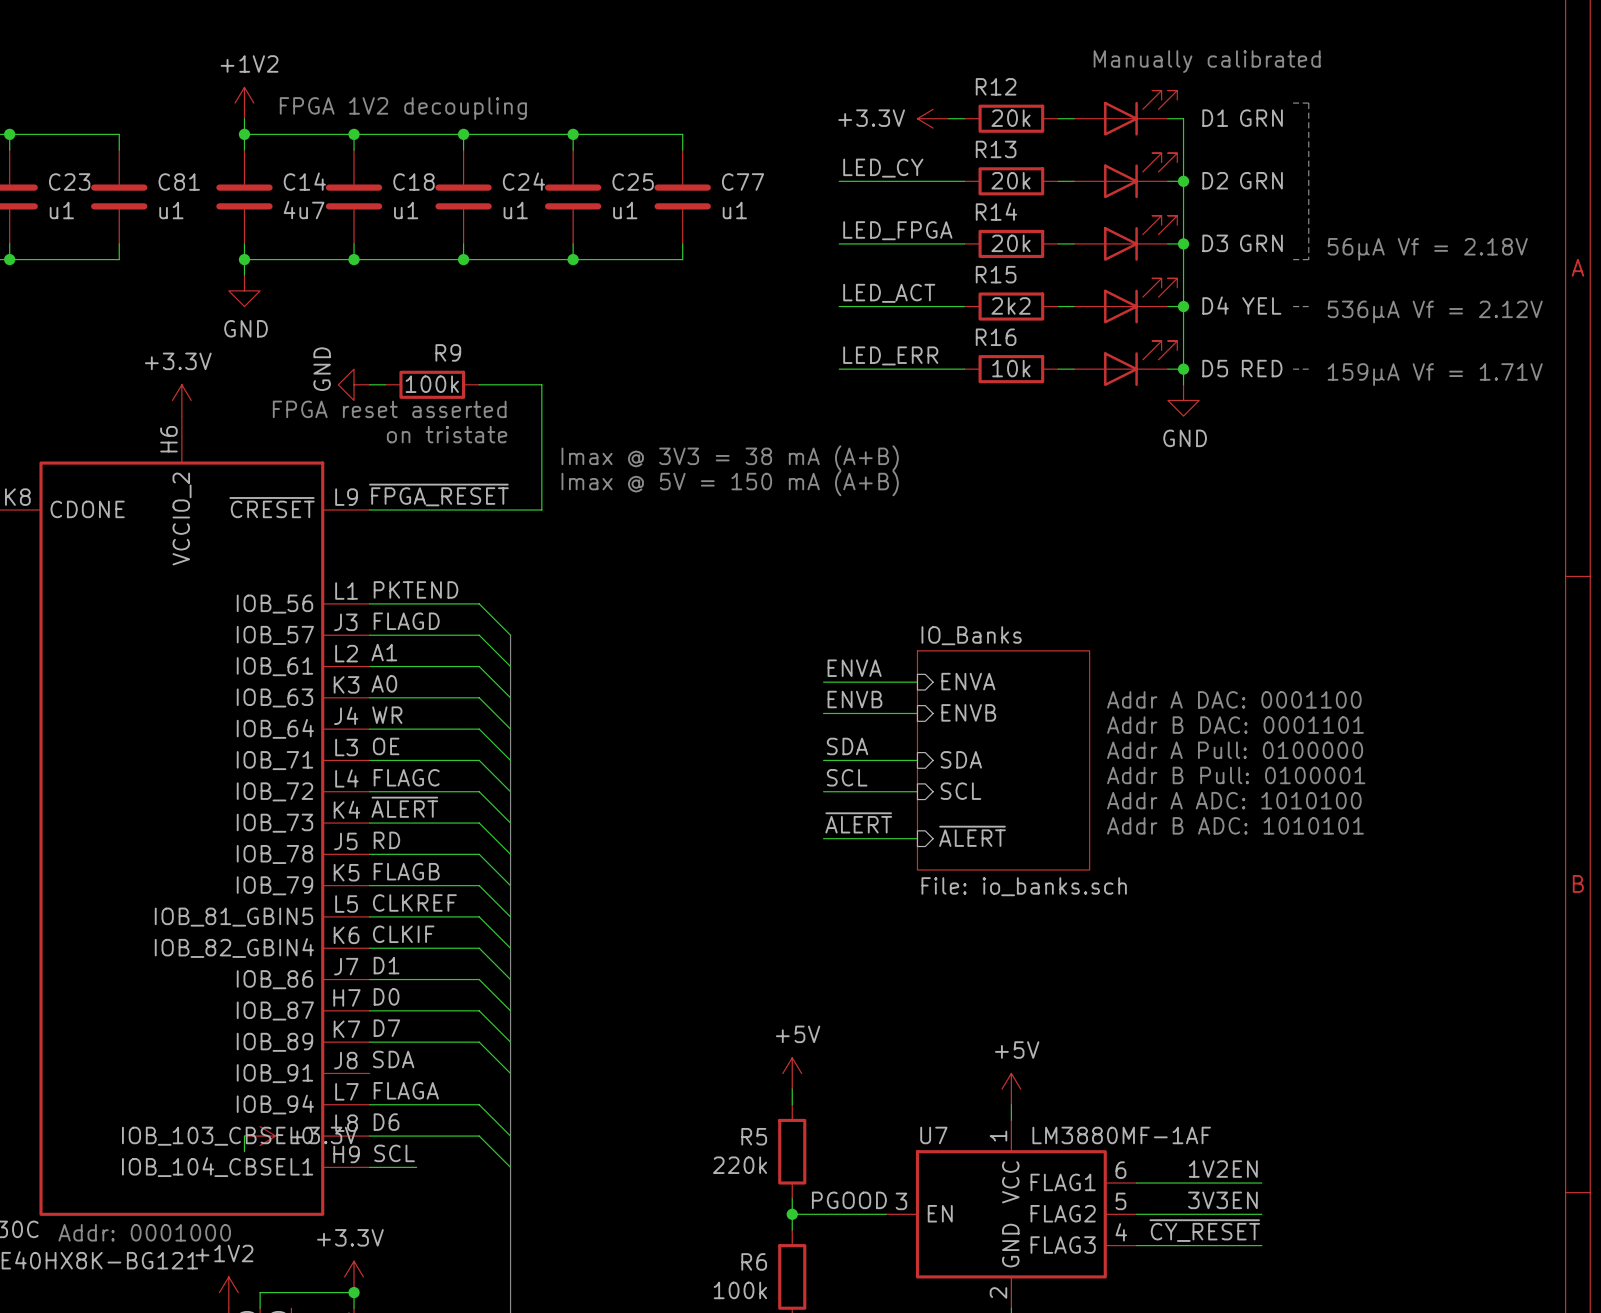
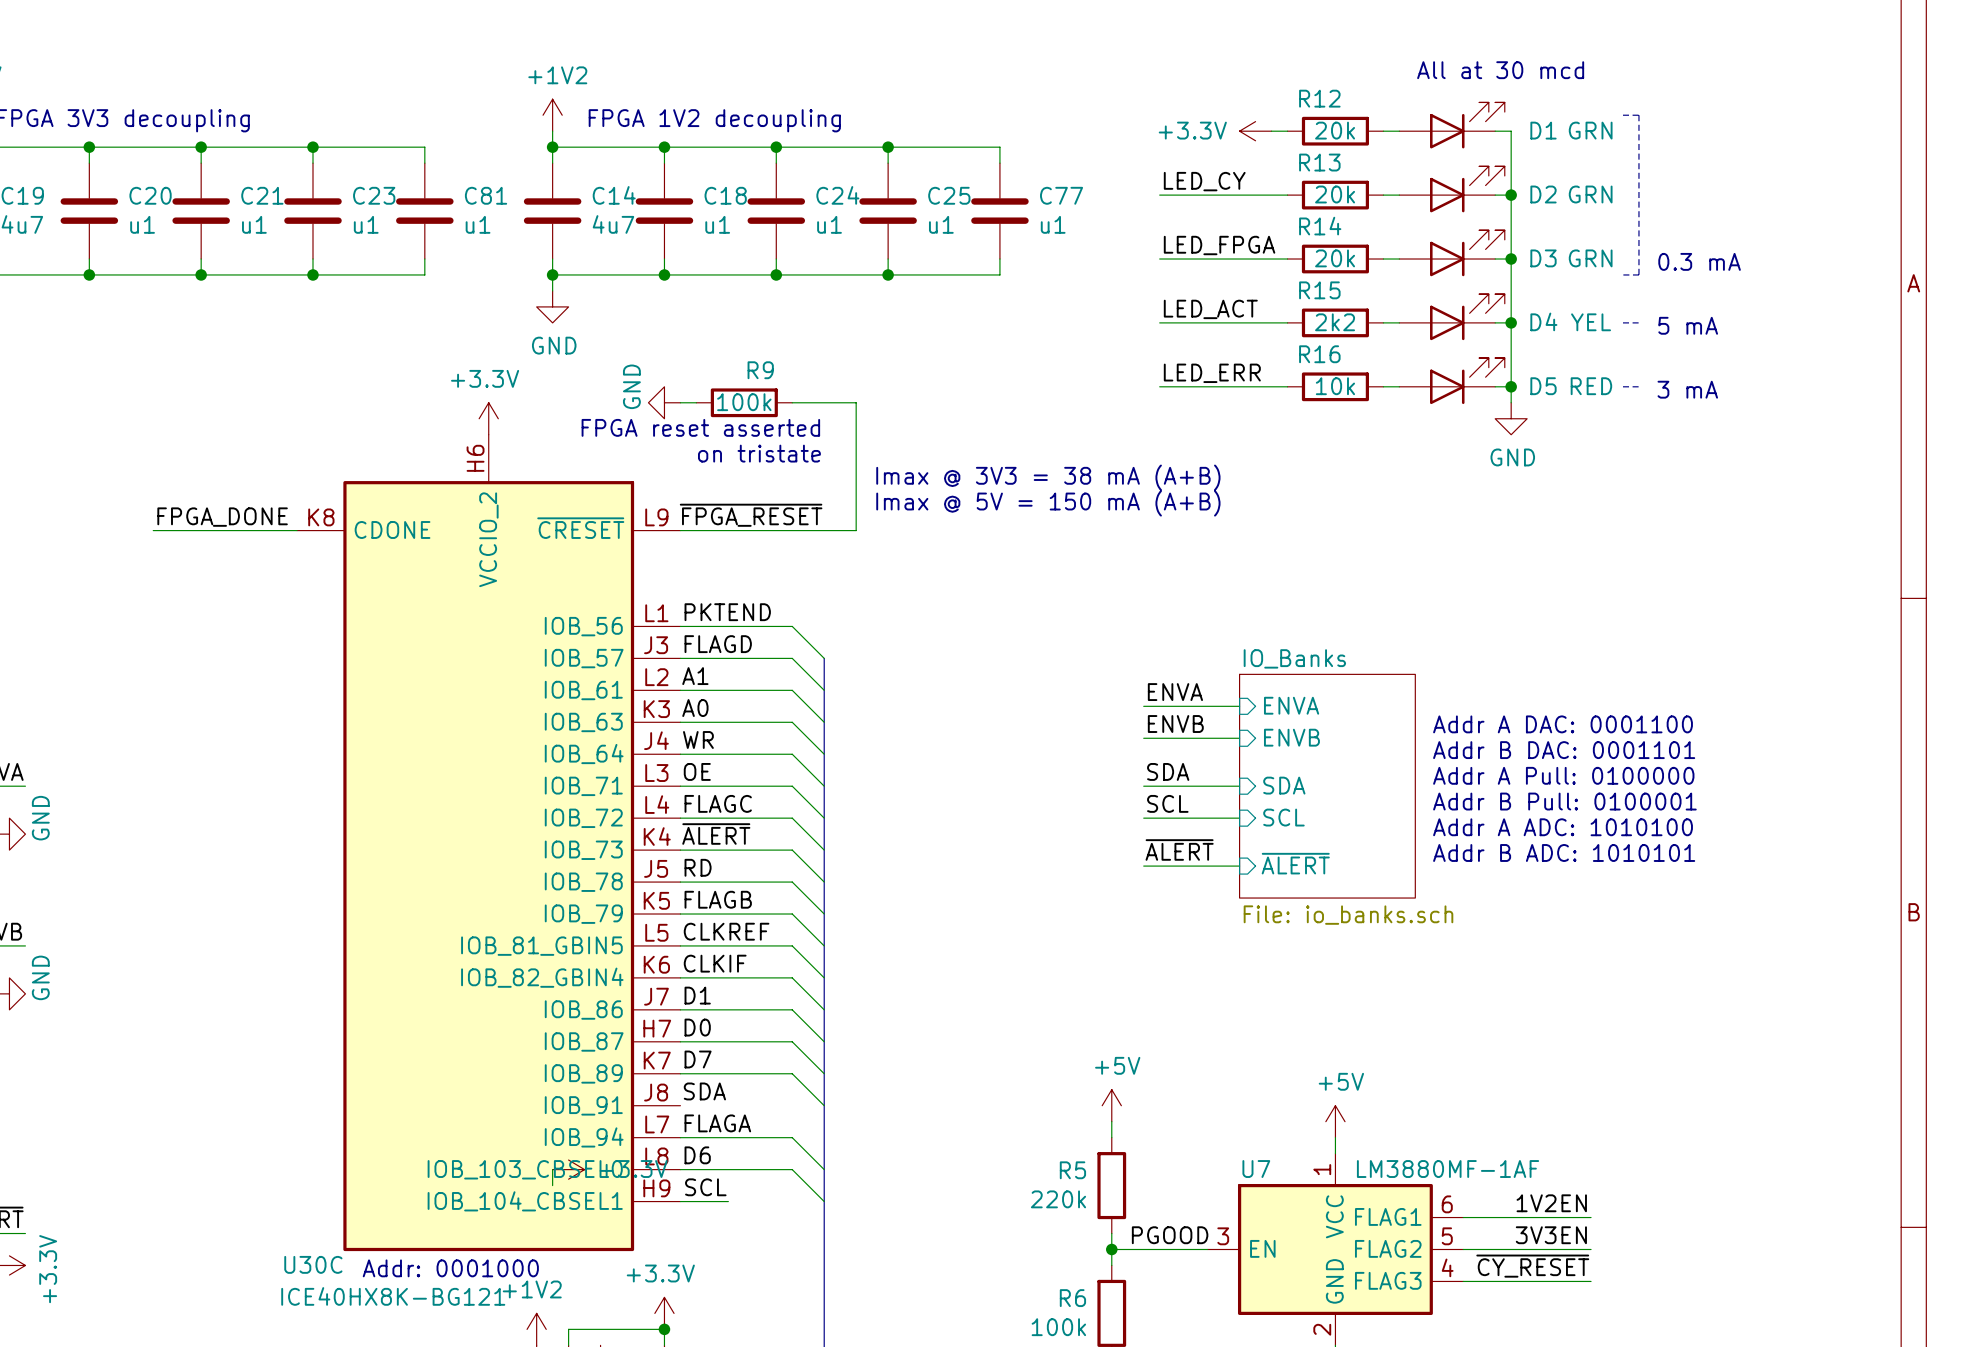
text: Manually calibrated (1207, 61) -> All at 30 mcd (1500, 70)
text: 56µA Vf = 2.18V (1427, 249) -> 0.3 mA (1699, 261)
text: 536µA Vf = 2.12V (1435, 311) -> 5 mA (1688, 325)
text: 159µA Vf = 1.71V (1435, 374) -> 3 mA (1687, 389)

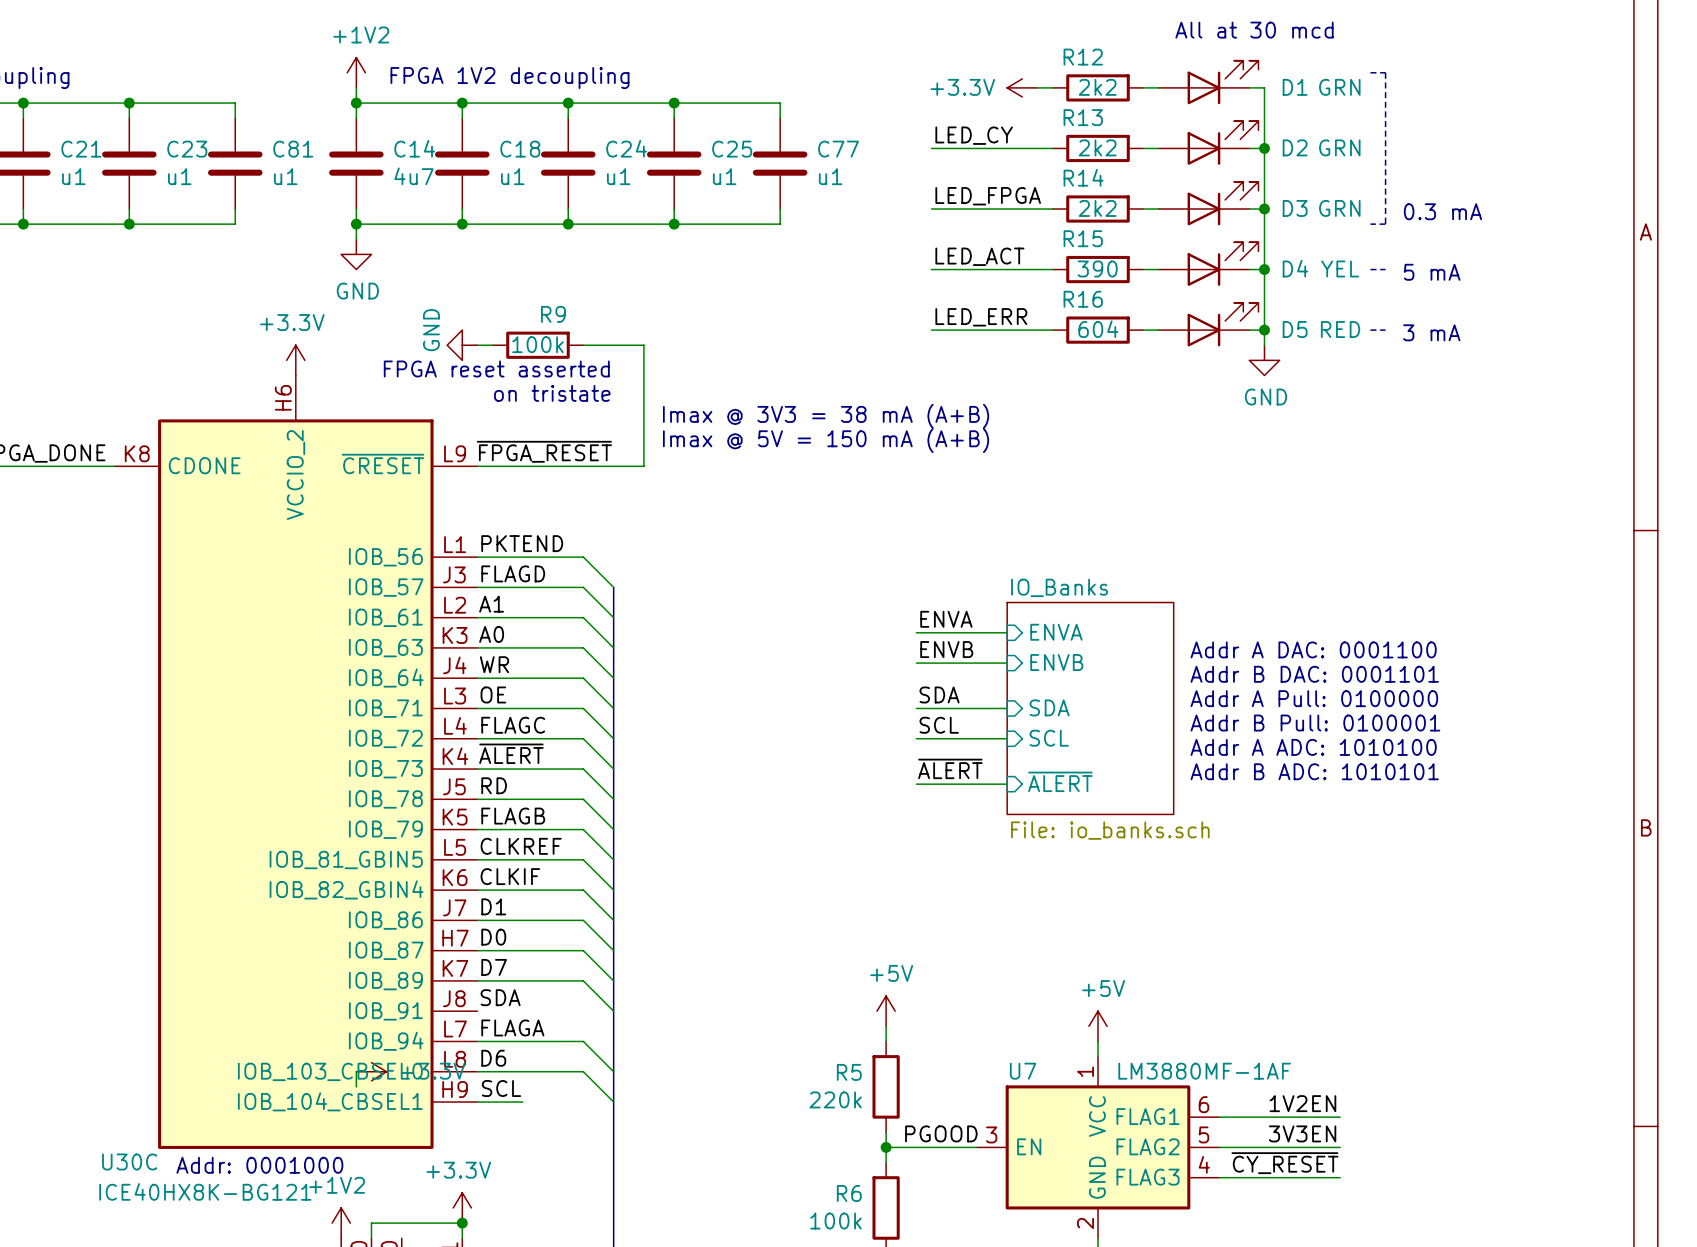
R12 value: 20k (1335, 130) -> 2k2 (1097, 87)
R13 value: 20k (1335, 194) -> 2k2 (1097, 147)
R14 value: 20k (1335, 258) -> 2k2 (1097, 208)
R15 value: 2k2 (1335, 322) -> 390 (1097, 268)
R16 value: 10k (1335, 386) -> 604 (1098, 329)

